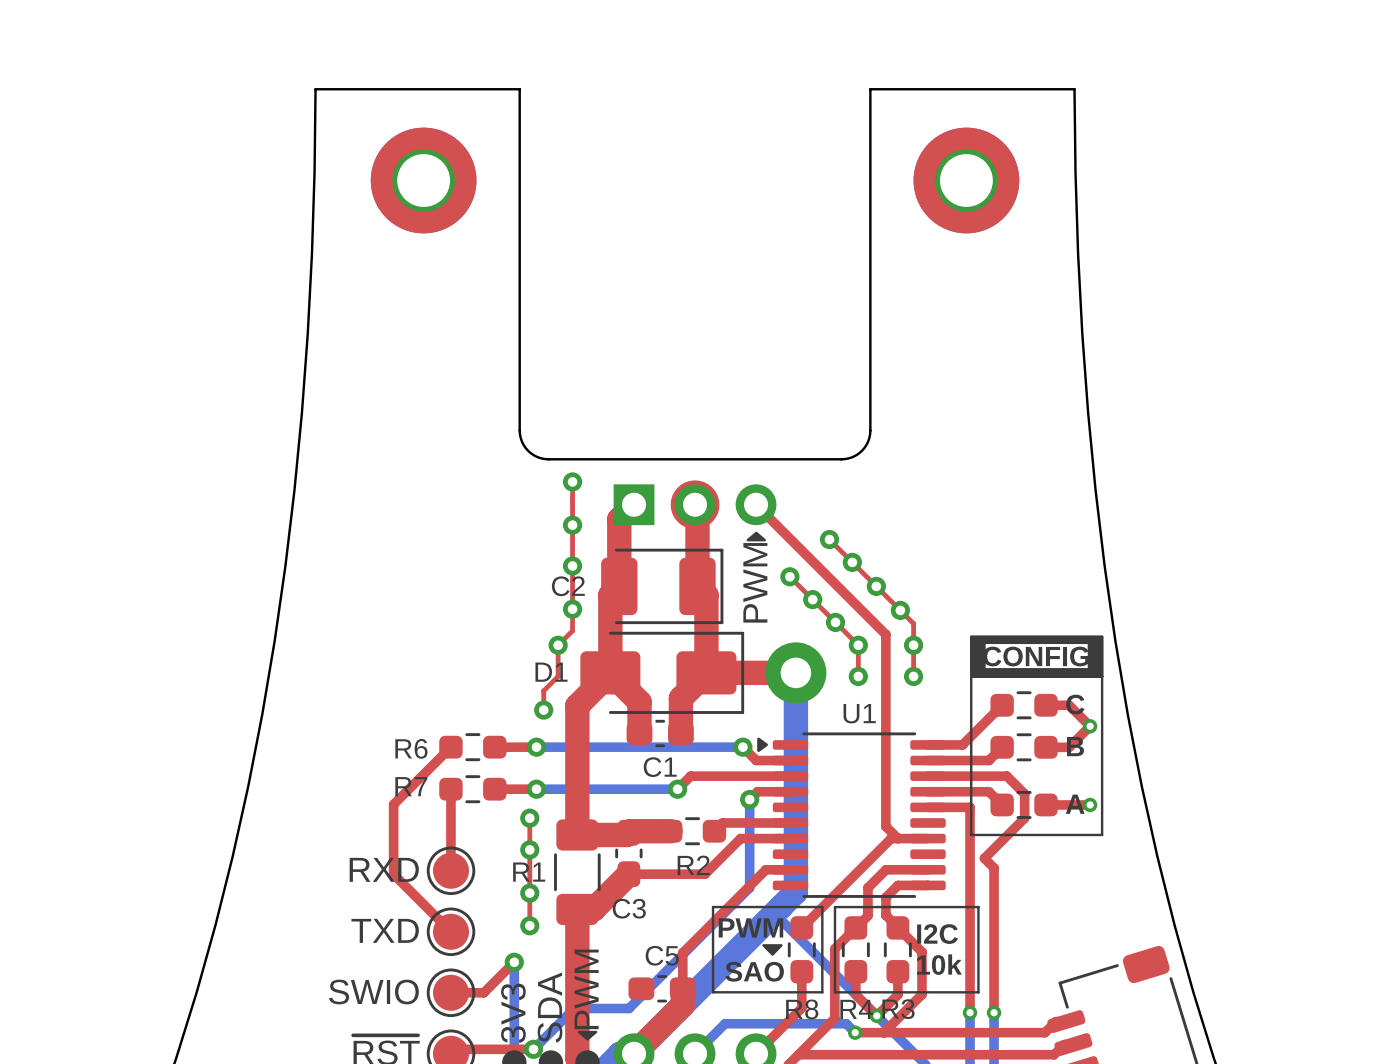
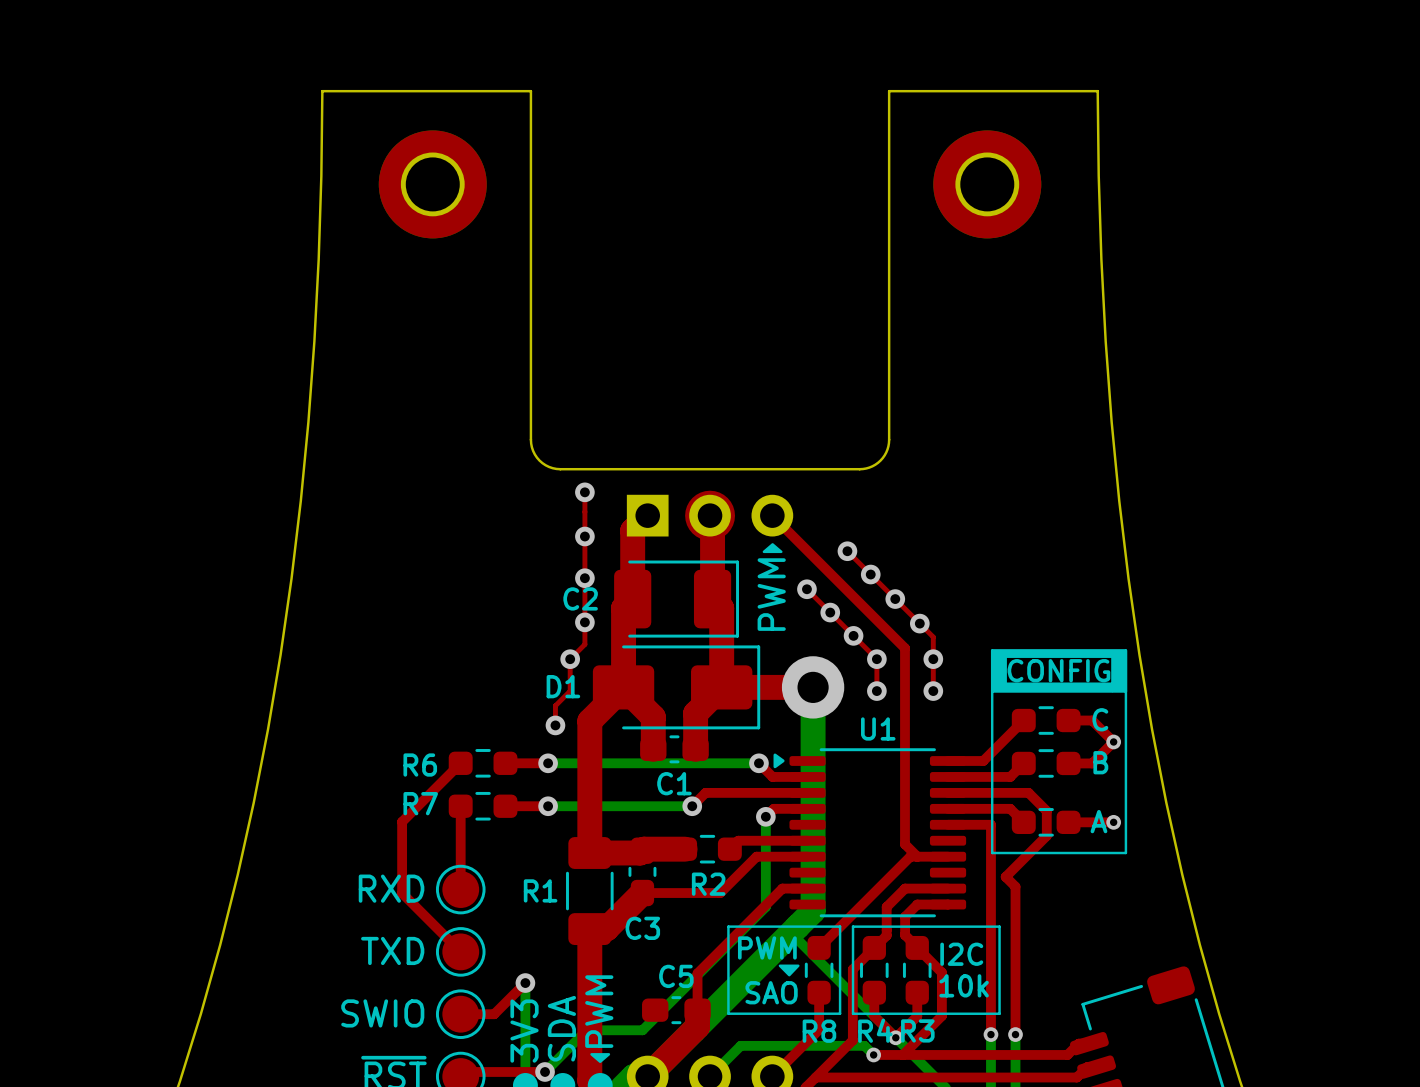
top track: (529, 818) (529, 890) -> none
via: (529, 818) -> none
via: (529, 849) -> none
top track: (529, 893) (529, 925) -> none
via: (529, 893) -> none
via: (529, 925) -> none

